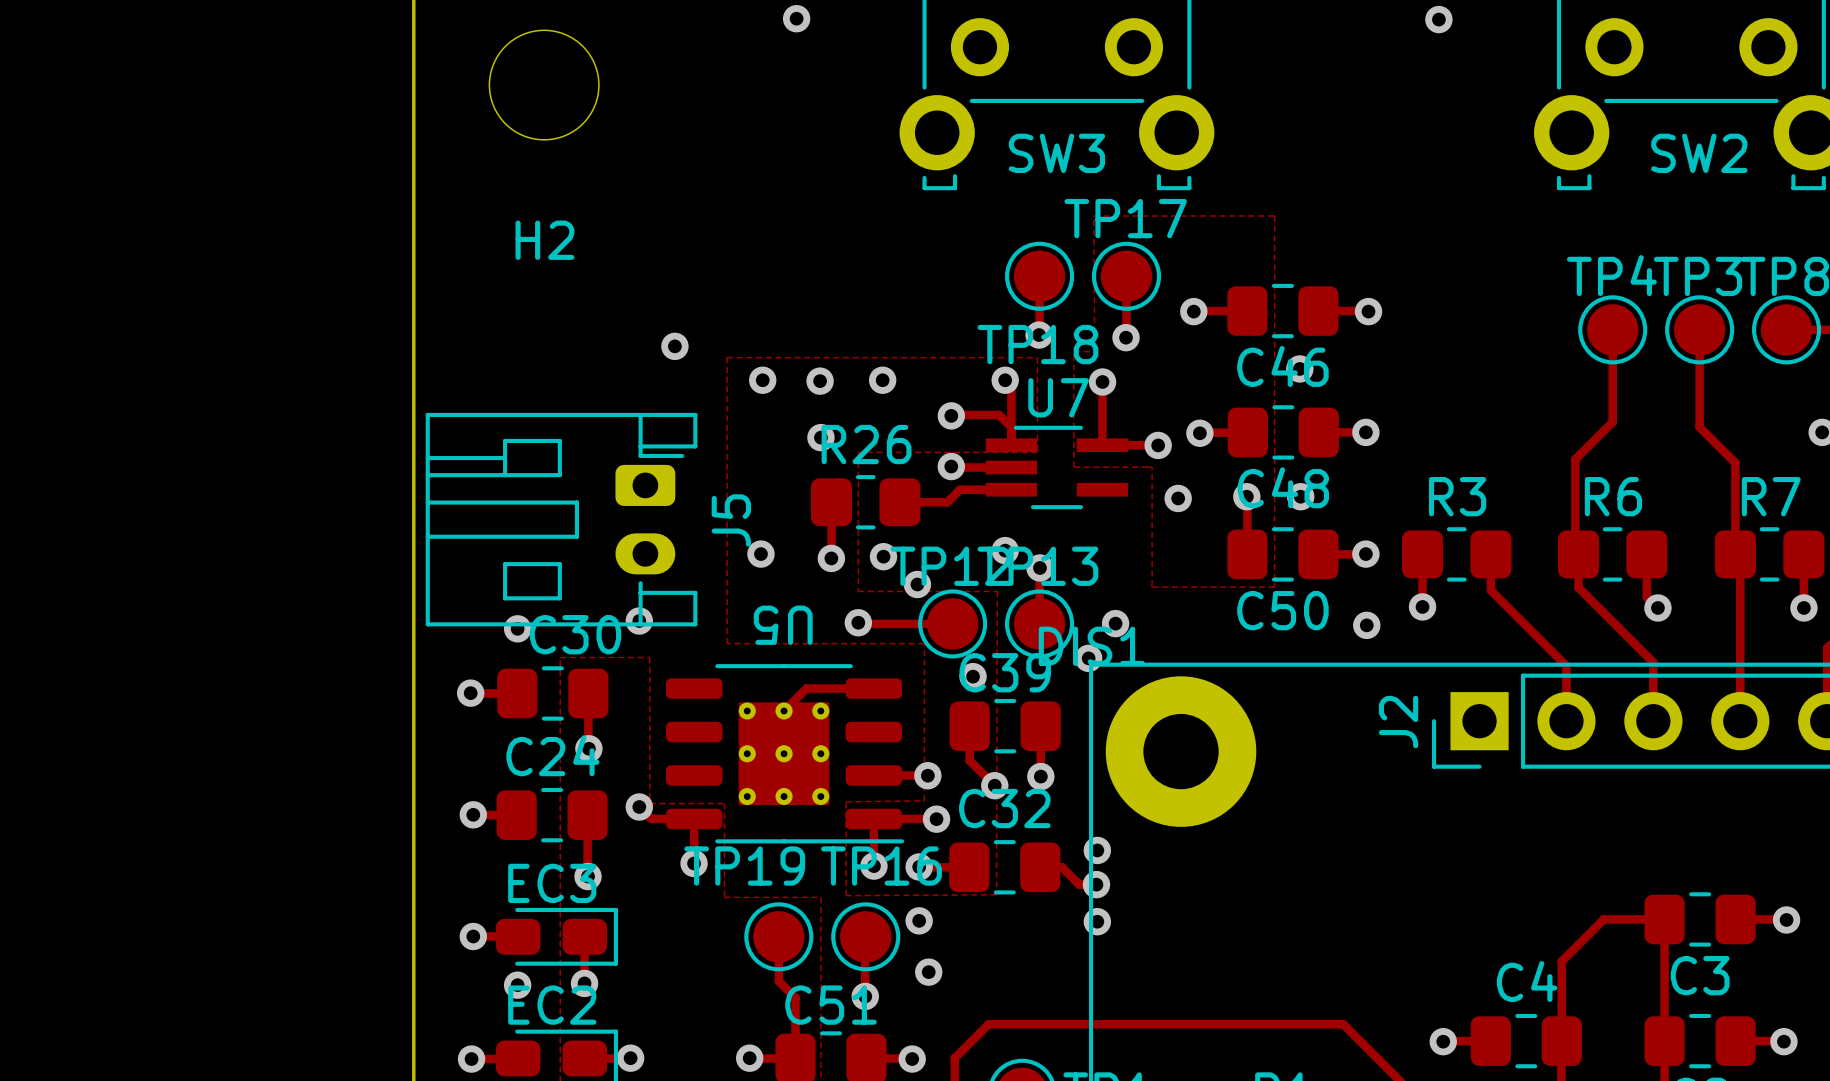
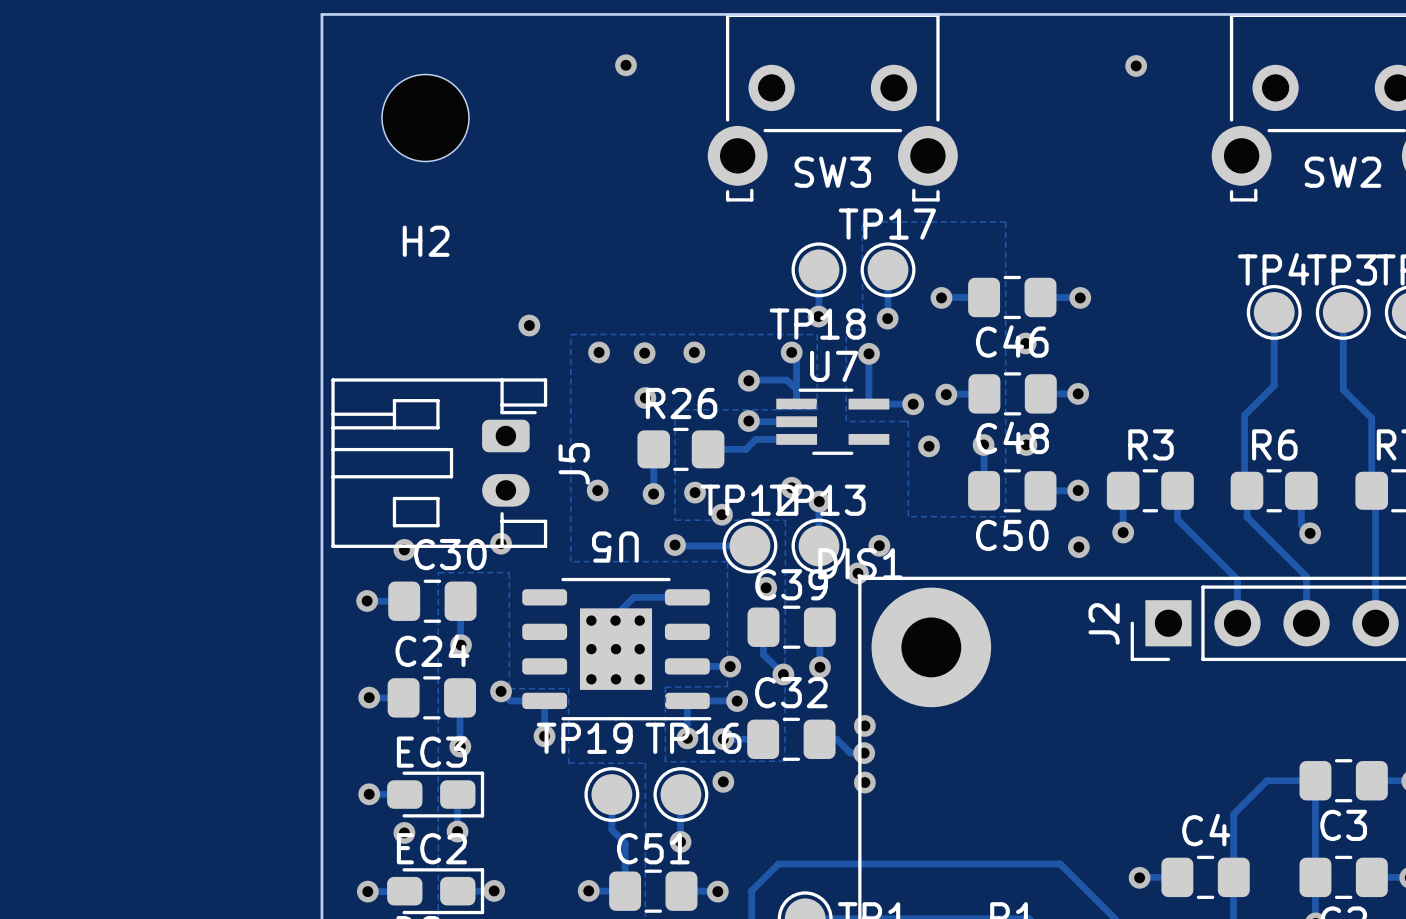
U5 footprint: [665, 664, 905, 844] -> [522, 577, 712, 721]
via: (928, 972) -> none

